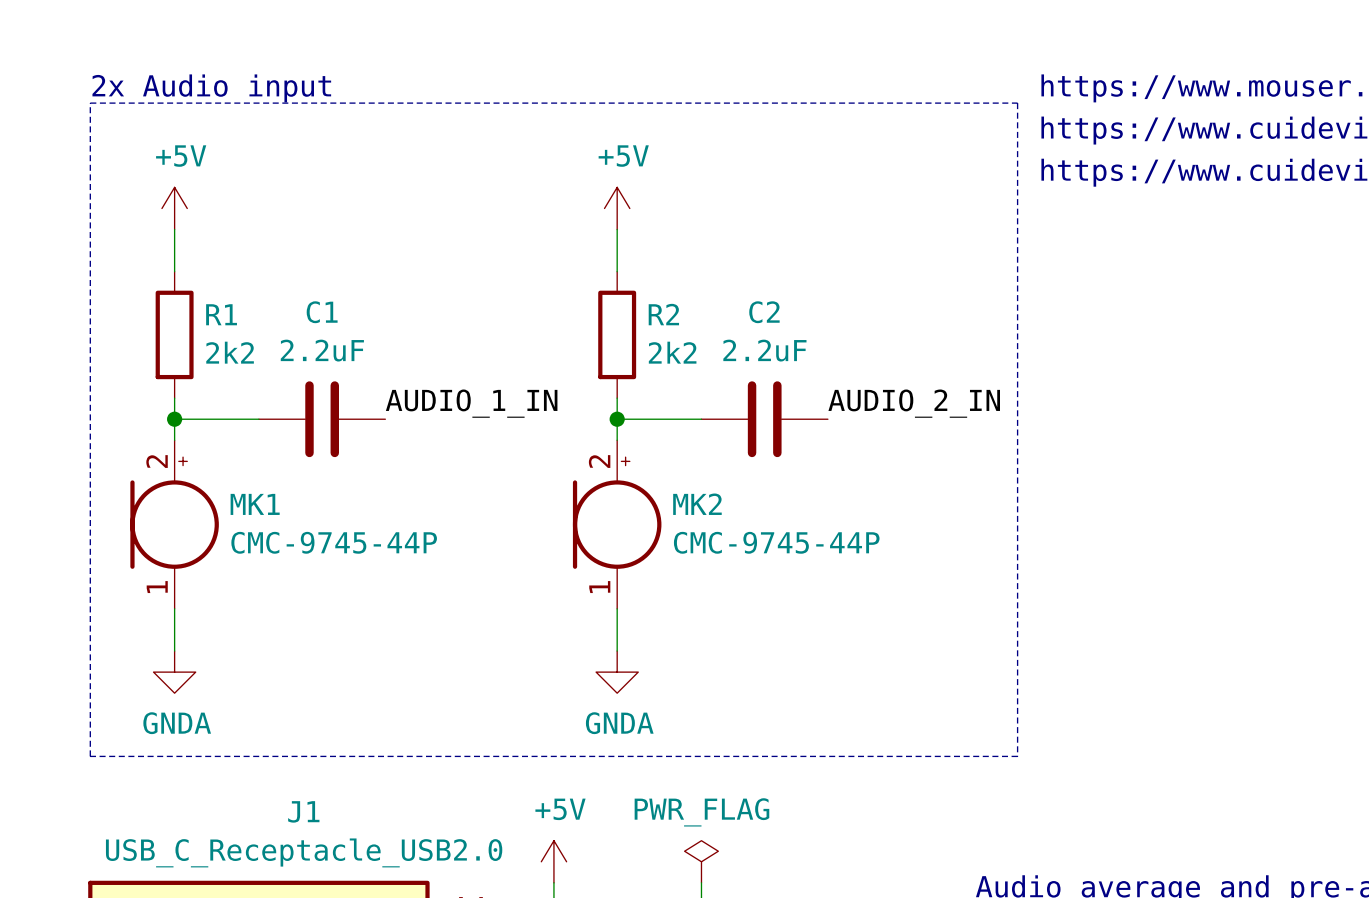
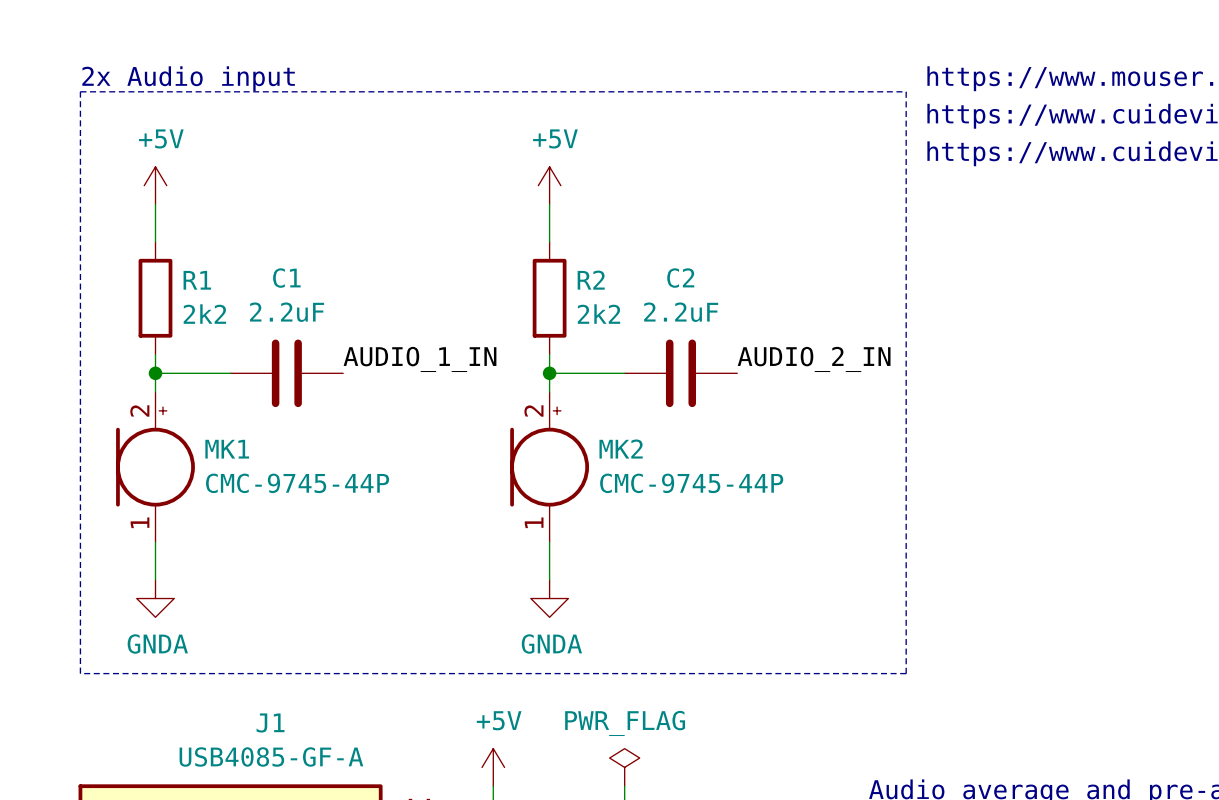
J1 value: USB_C_Receptacle_USB2.0 (304, 852) -> USB4085-GF-A (271, 756)

